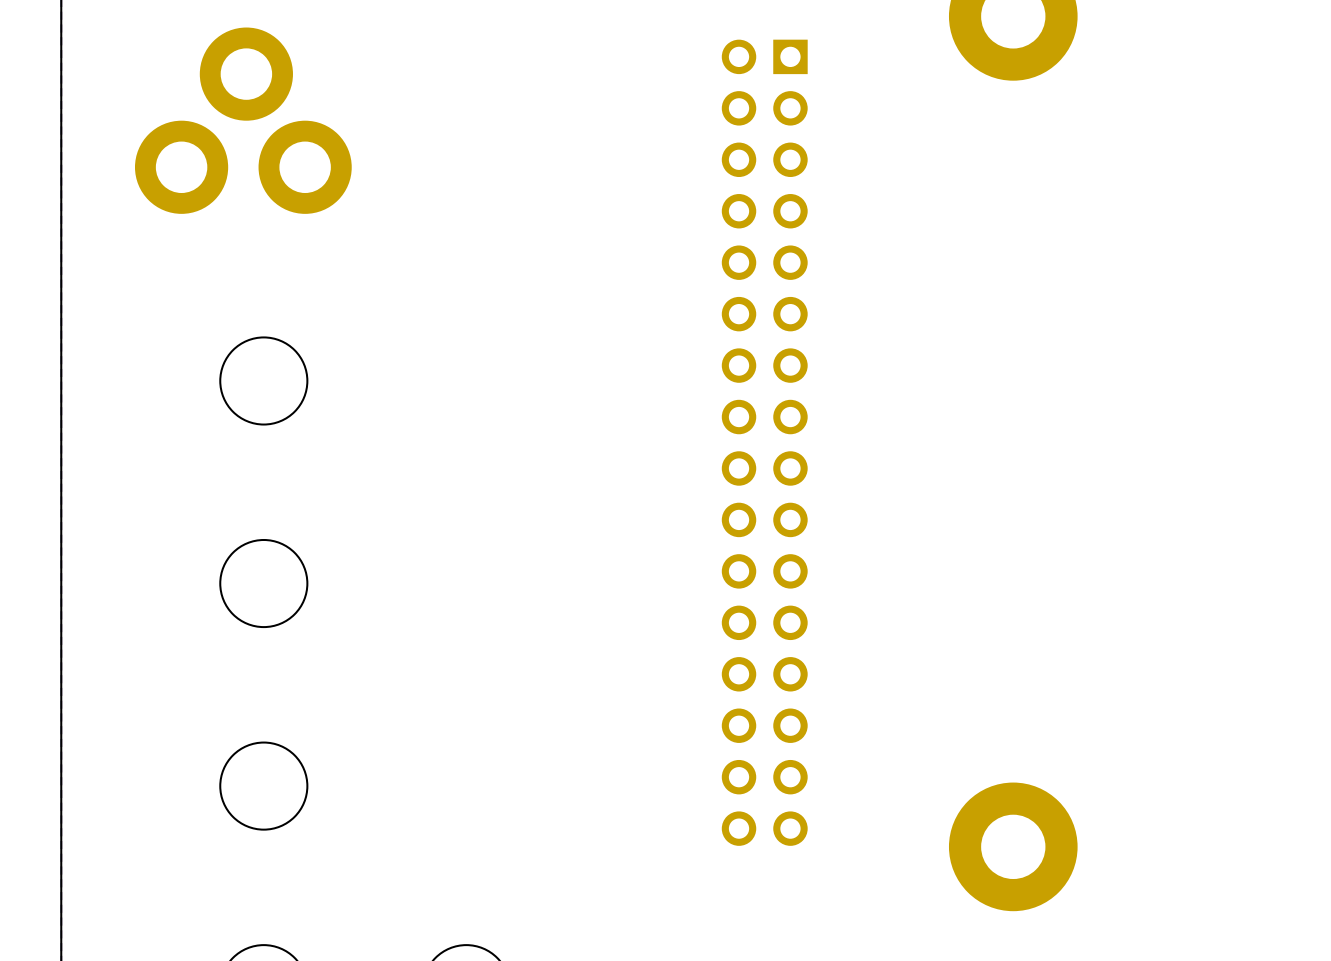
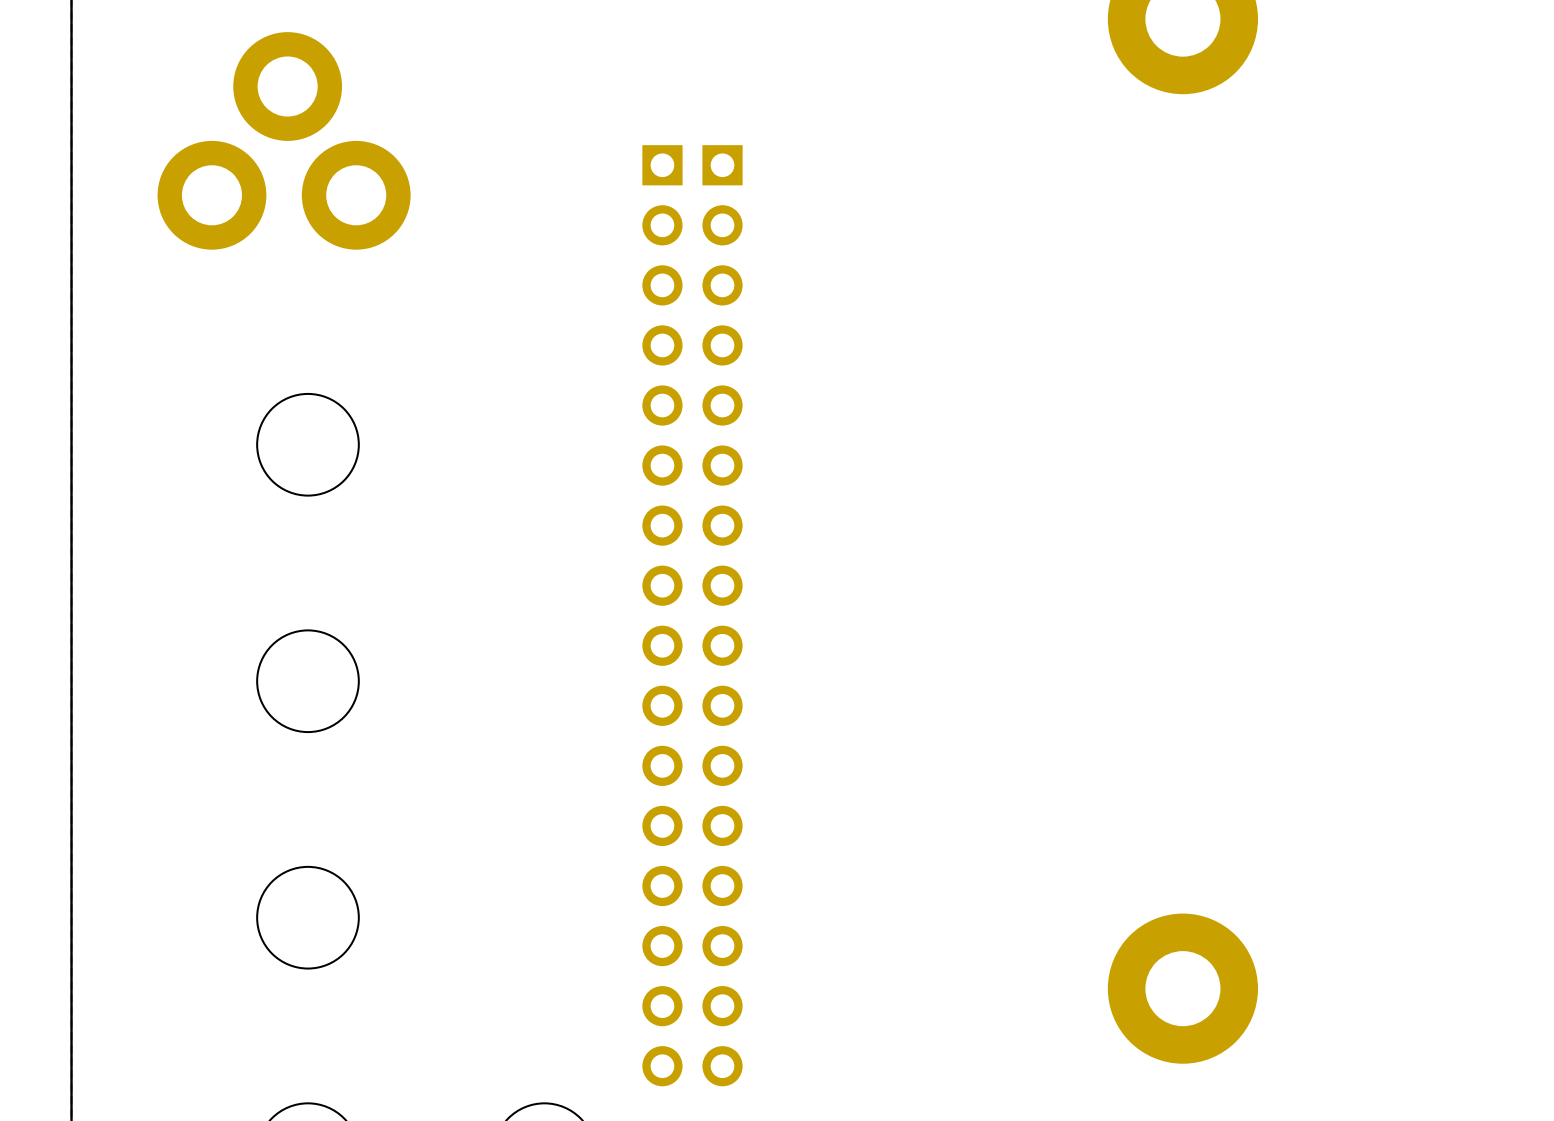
part: (764, 442) -> none
part: none -> (662, 615)
part: none -> (722, 615)

